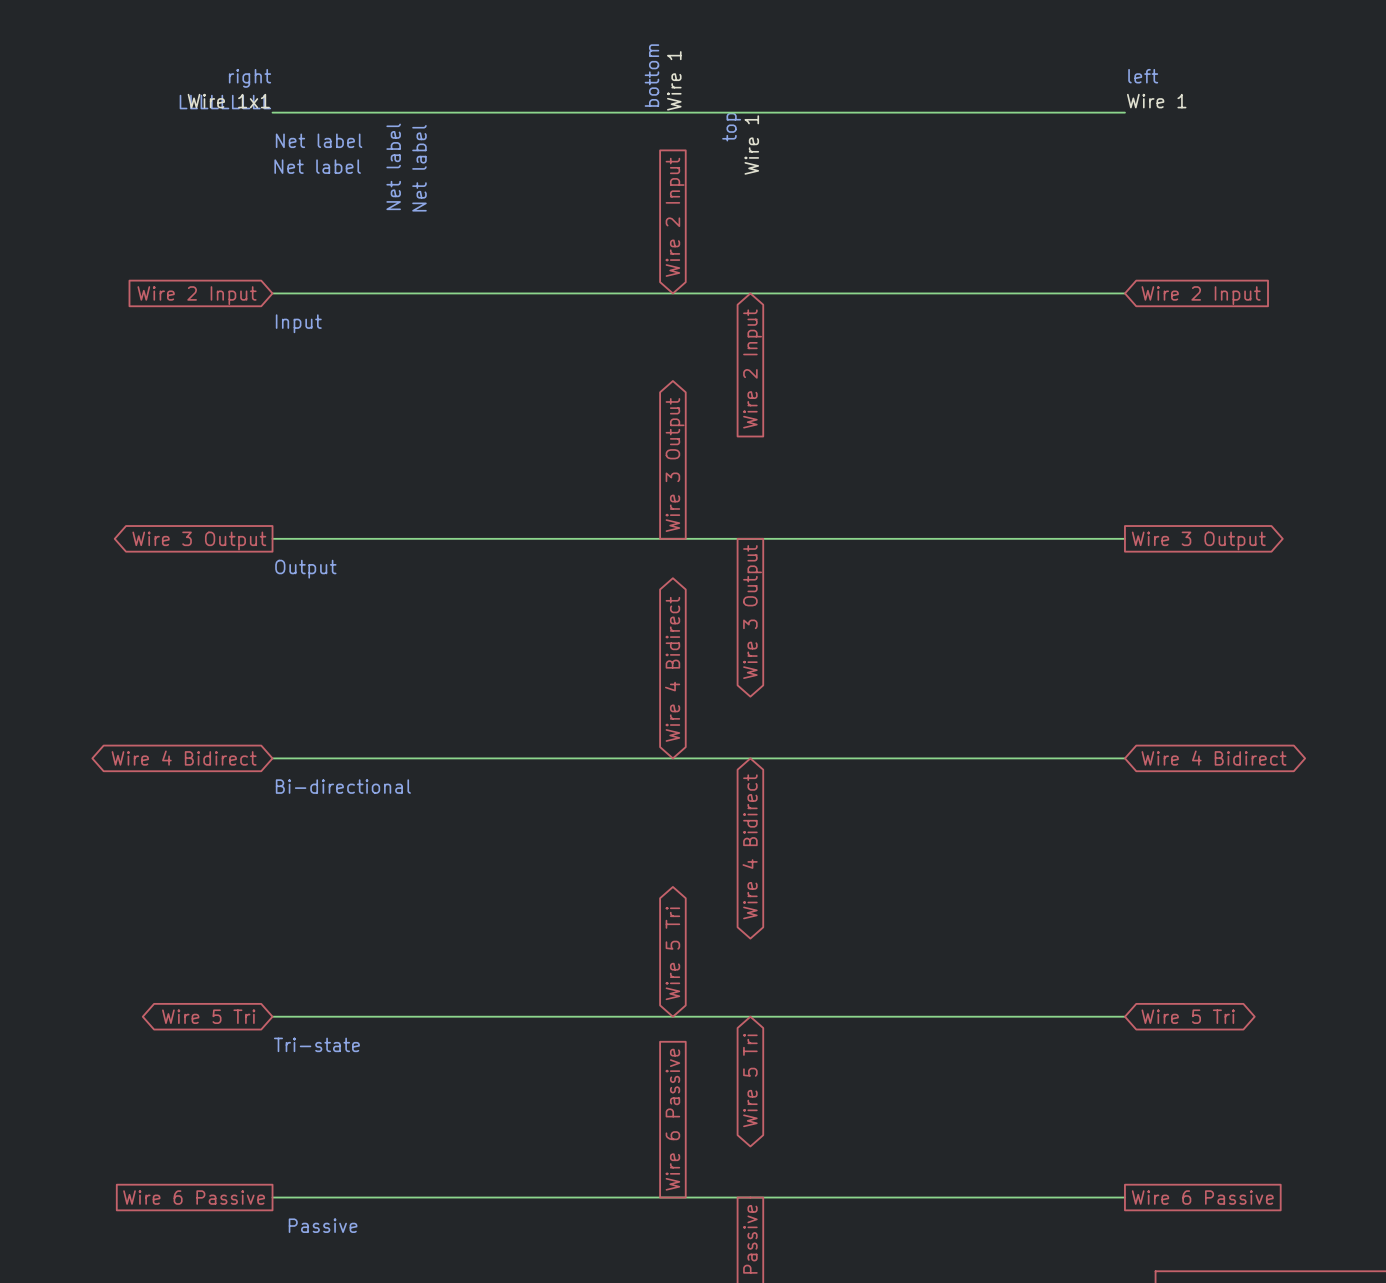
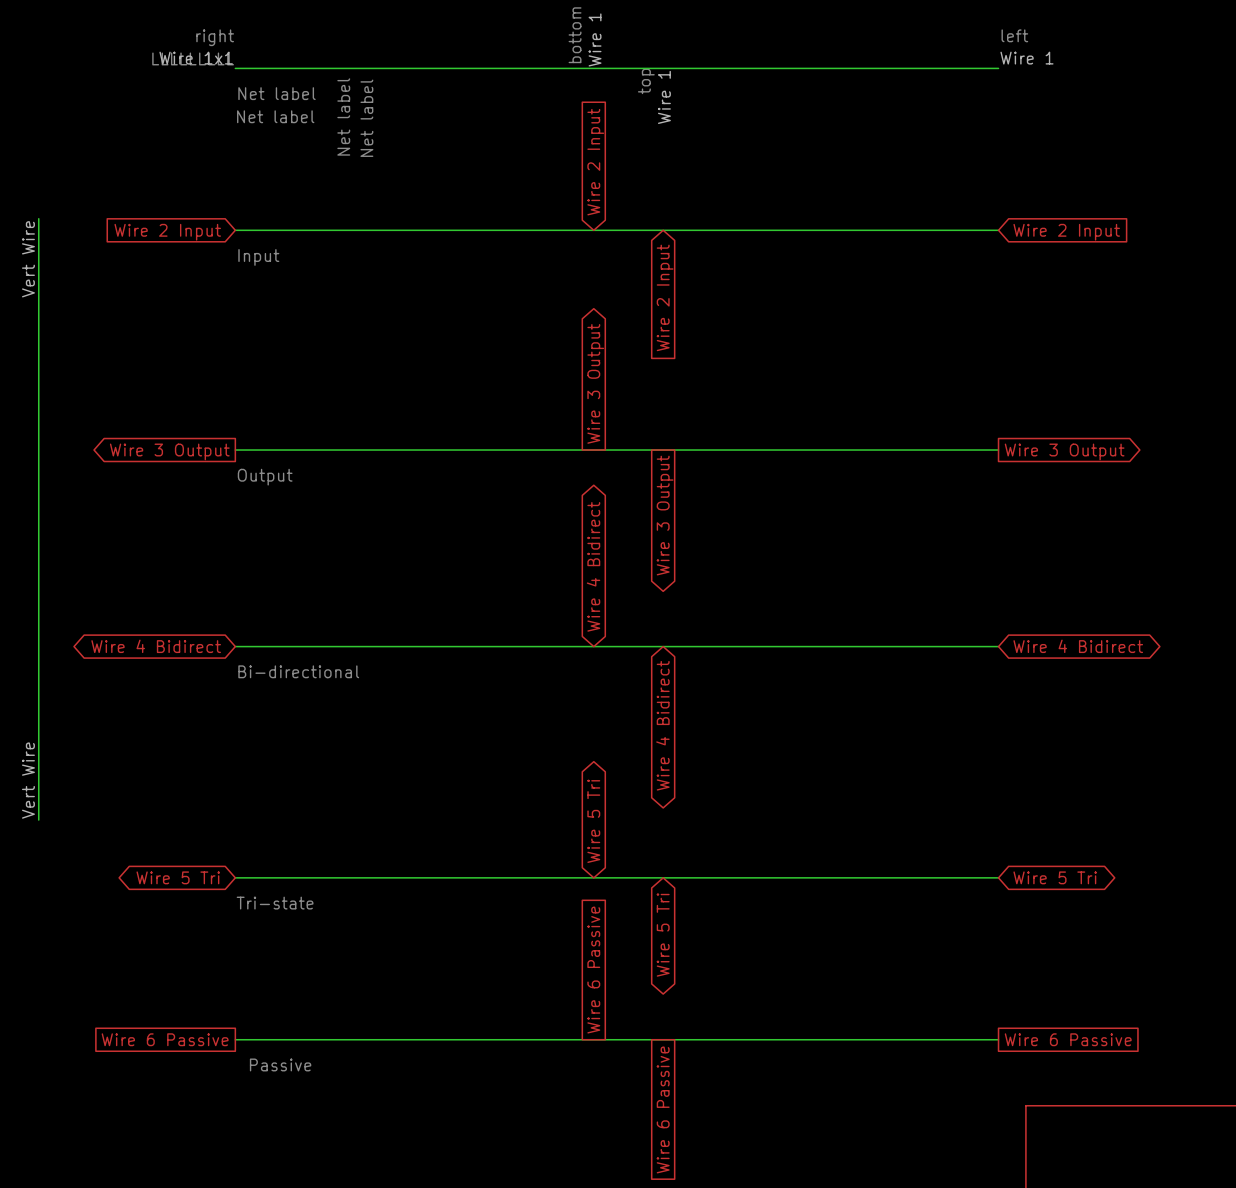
wire: none -> (38, 218) (38, 820)
label: none -> Vert Wire (28, 259)
label: none -> Vert Wire (28, 780)

